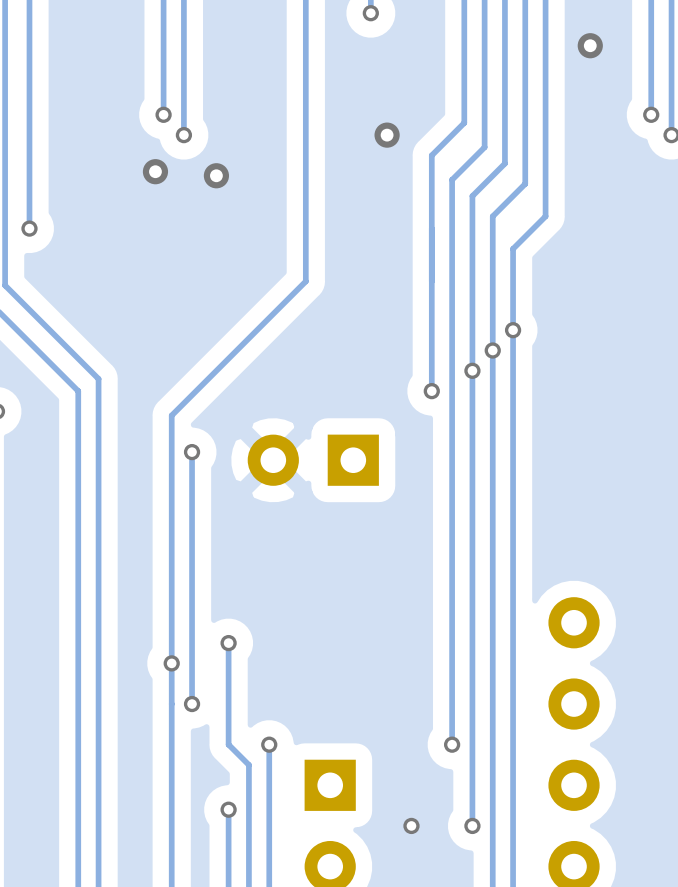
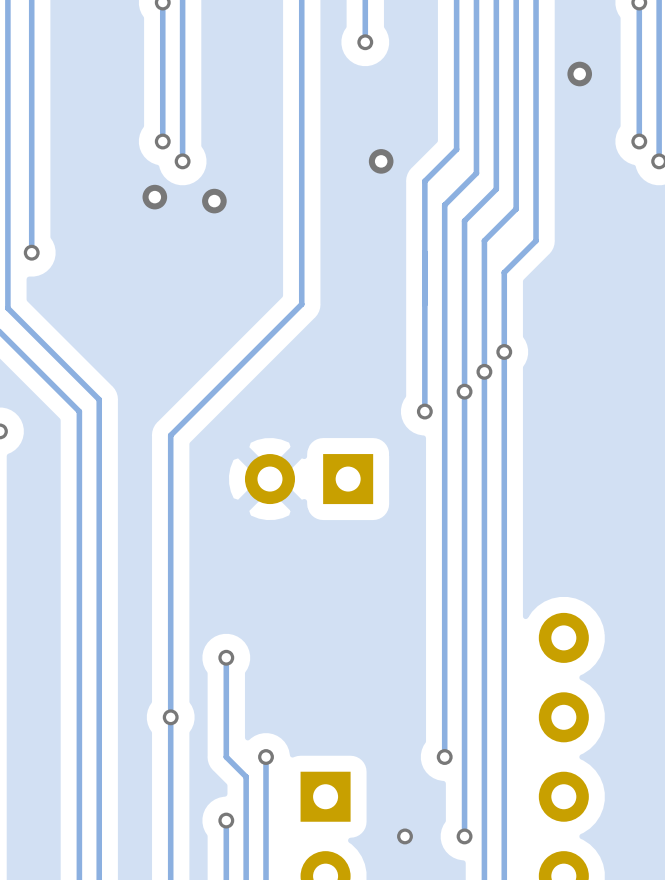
track: (192, 452) (192, 704) -> none
via: (192, 452) -> none
via: (171, 663) -> none
via: none -> (170, 717)
via: (192, 704) -> none

